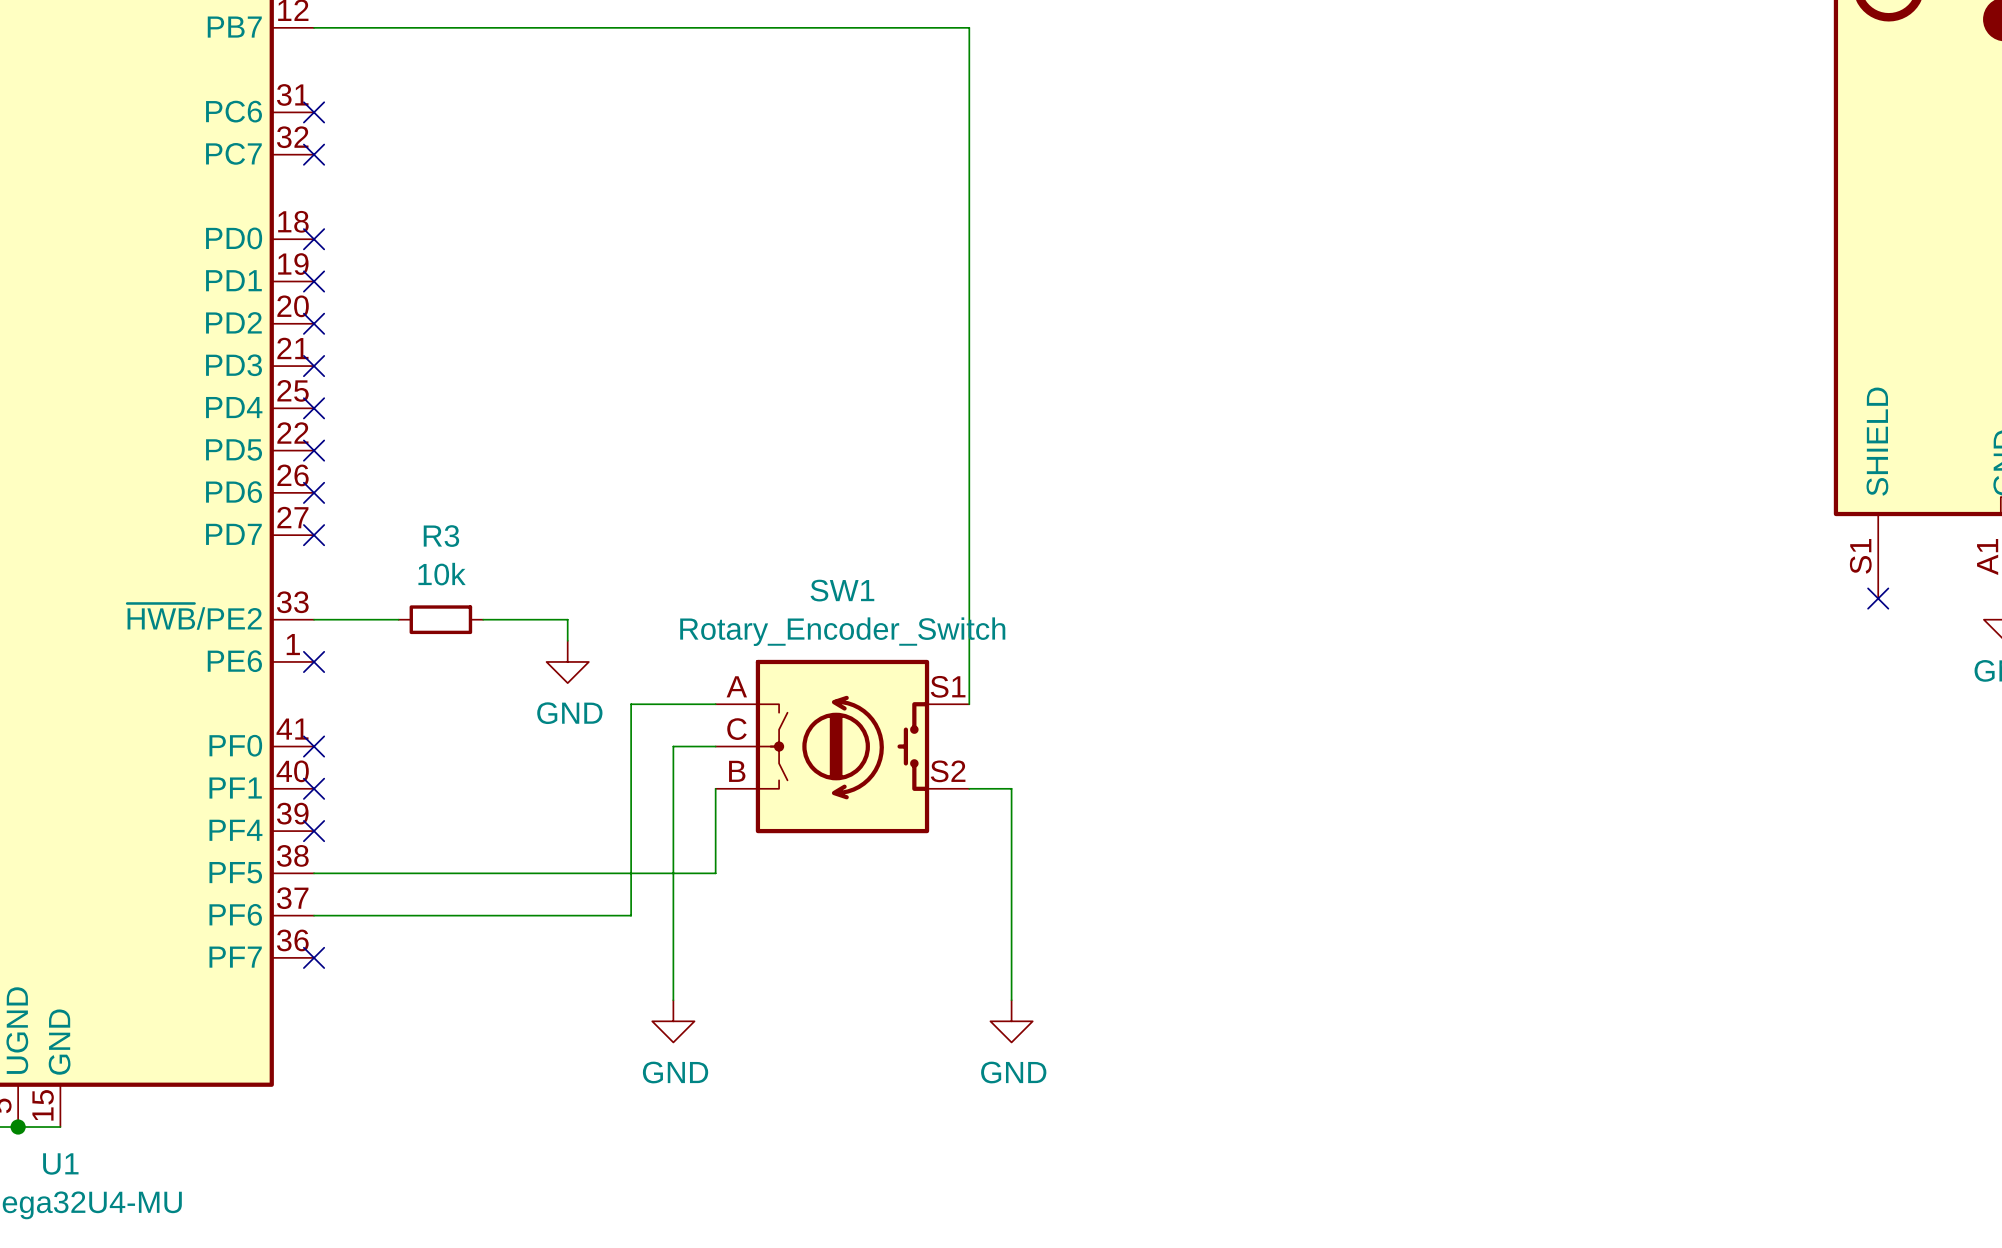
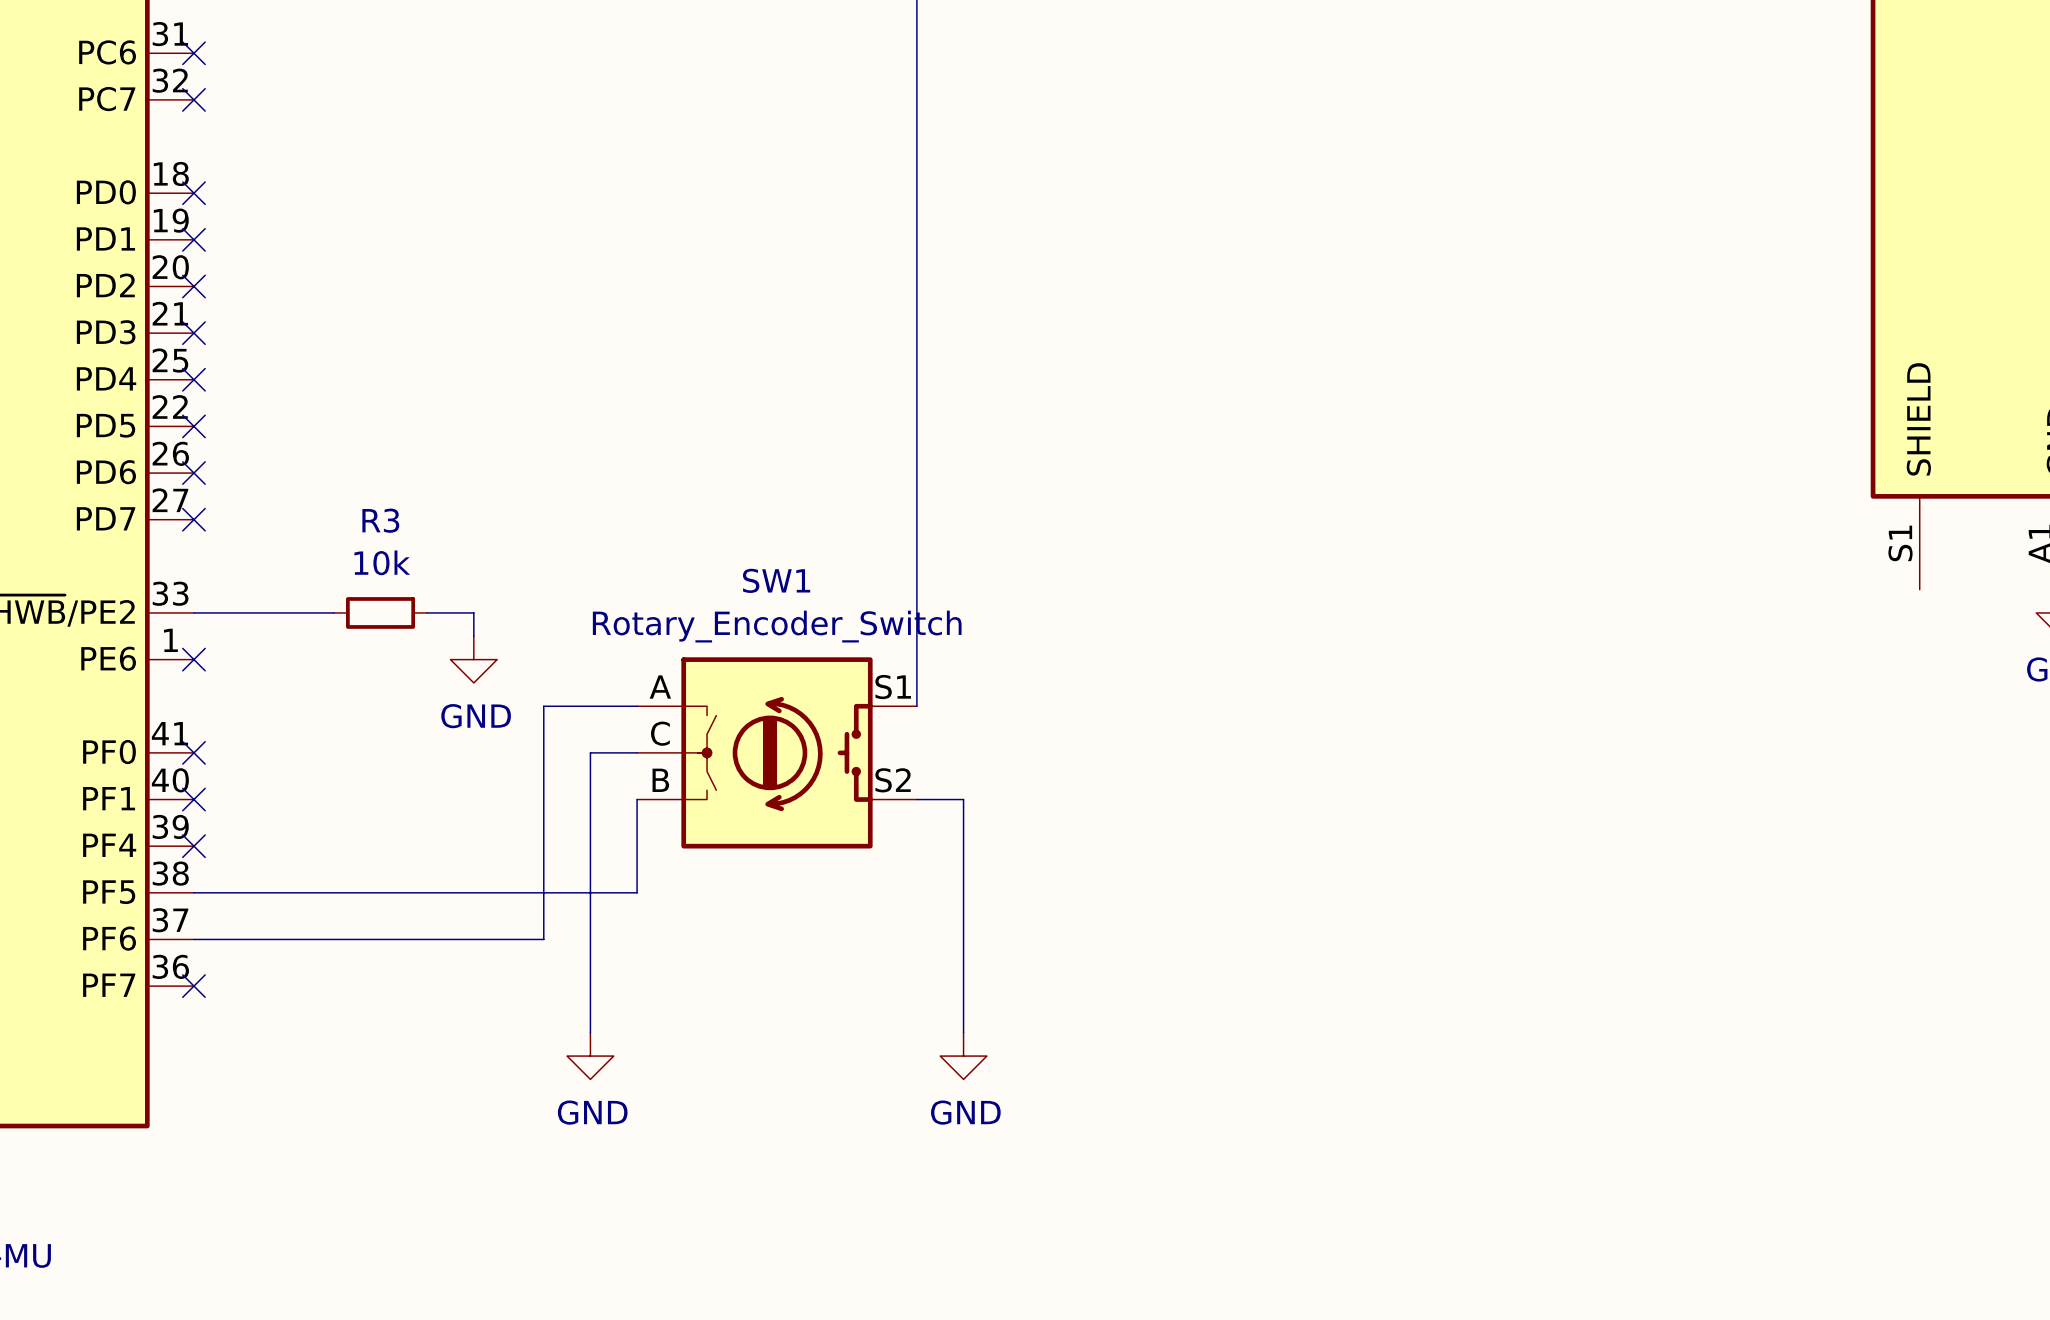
no-connect mark: (1878, 598) -> none
R3 position: (440, 619) -> (380, 612)
wire: (483, 619) (525, 619) -> (287, 612) (333, 612)

